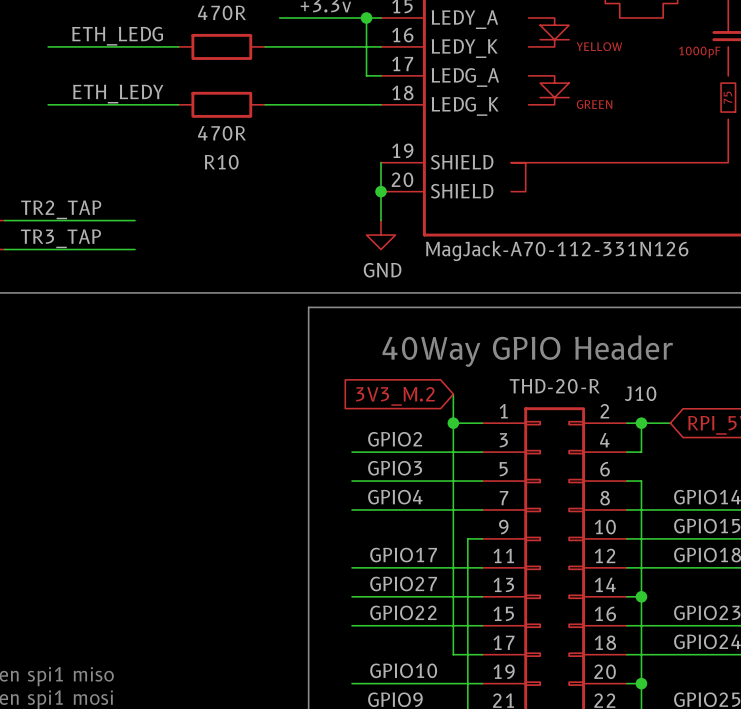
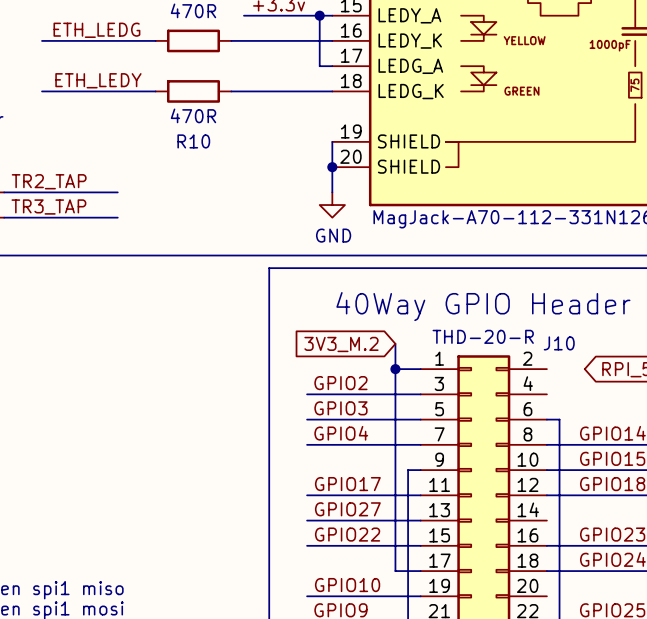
wire: (626, 423) (670, 423) -> none
wire: (641, 423) (641, 452) (626, 452) -> none
junction: (641, 423) -> none
wire: (626, 596) (641, 596) -> none
junction: (641, 596) -> none
wire: (626, 683) (641, 683) -> none
junction: (641, 683) -> none

